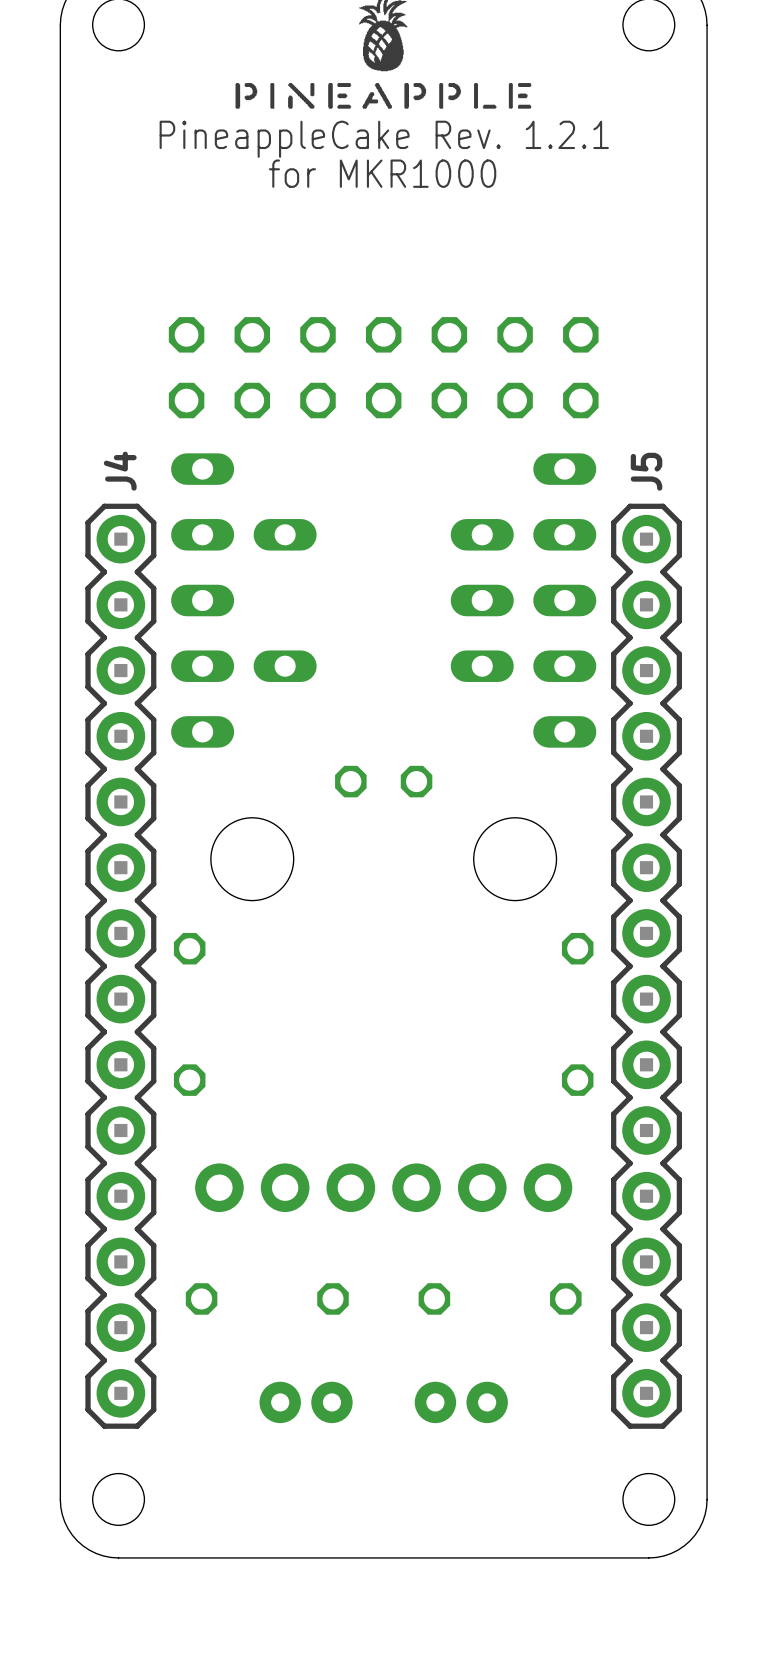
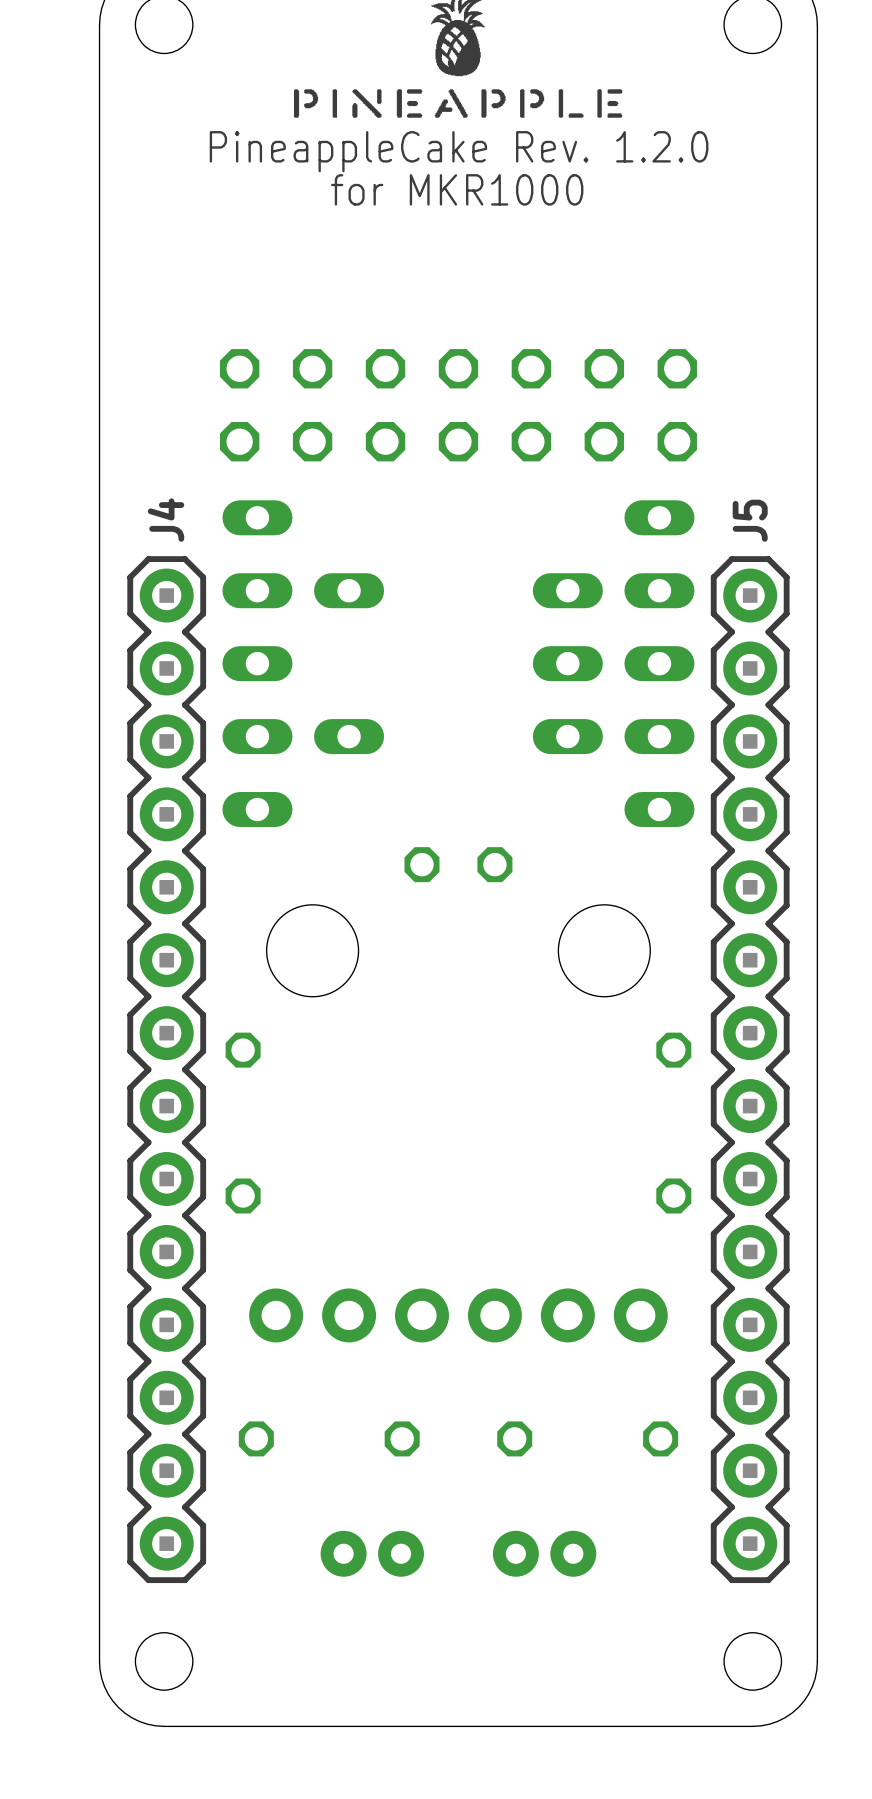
text: PineappleCake Rev. 1.2.1 (384, 139) -> PineappleCake Rev. 1.2.0 (459, 151)

